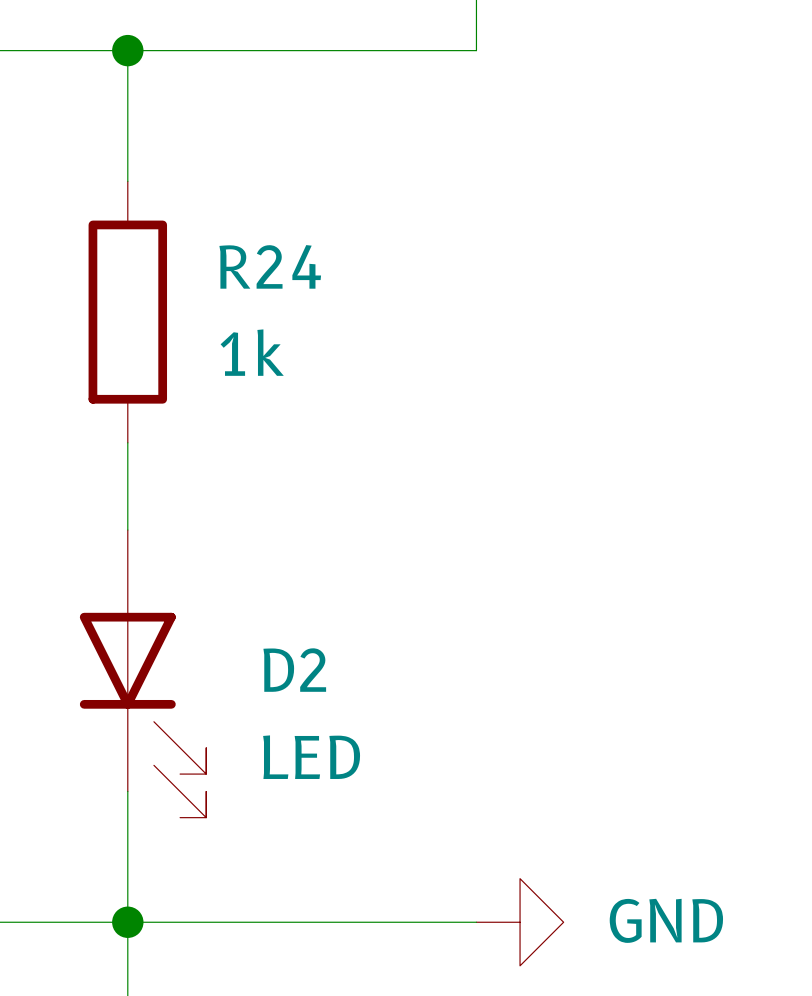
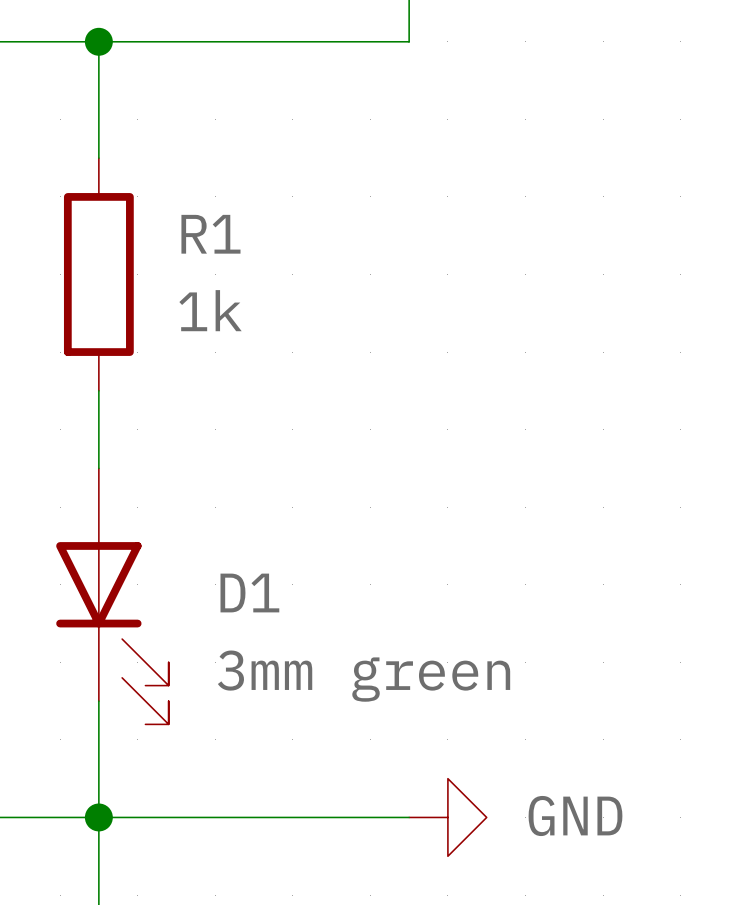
R24 name: R24 (270, 266) -> R1 (210, 234)
D2 name: D2 (294, 670) -> D1 (249, 593)
D2 value: LED (311, 757) -> 3mm green (364, 676)

